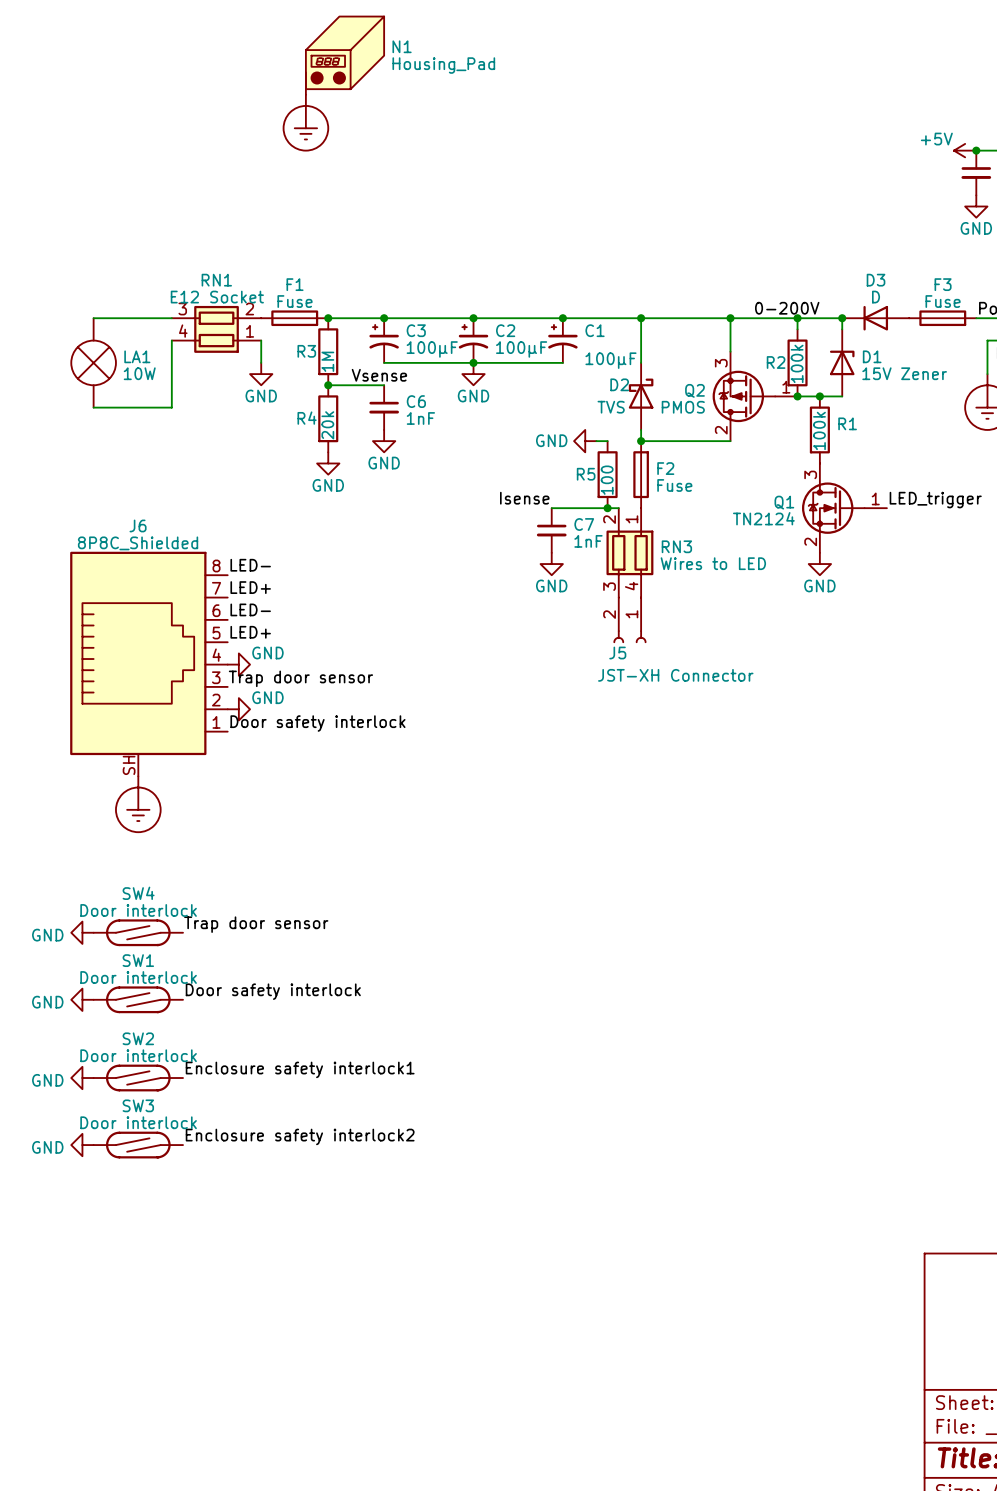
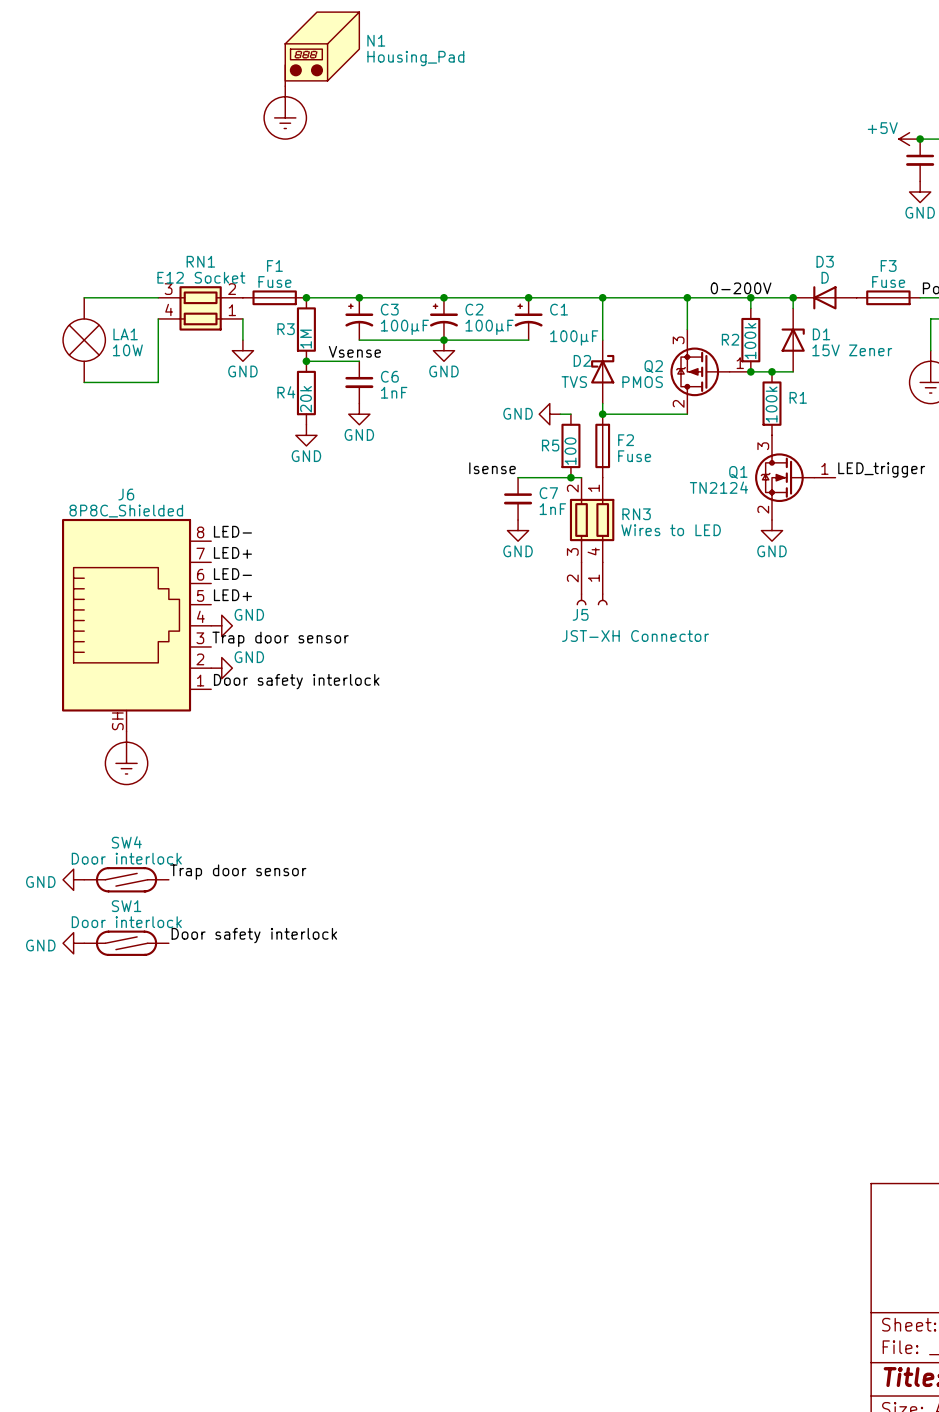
label: Enclosure safety interlock1 (300, 1069) -> none
power symbol: GND (82, 1078) -> none
SW2: Door interlock (138, 1078) -> none
label: Enclosure safety interlock2 (300, 1136) -> none
power symbol: GND (82, 1145) -> none
SW3: Door interlock (138, 1145) -> none

